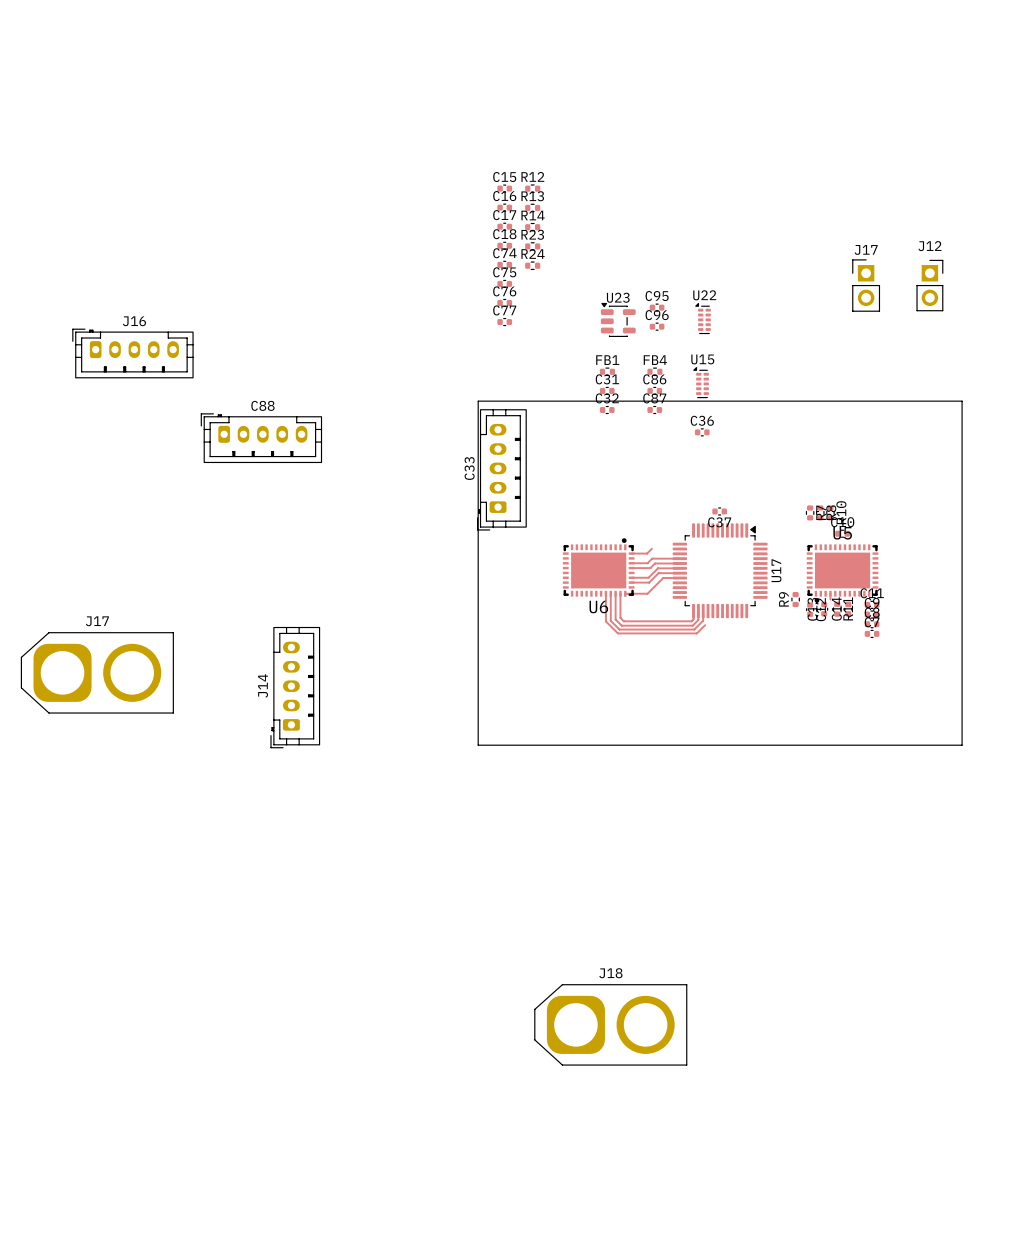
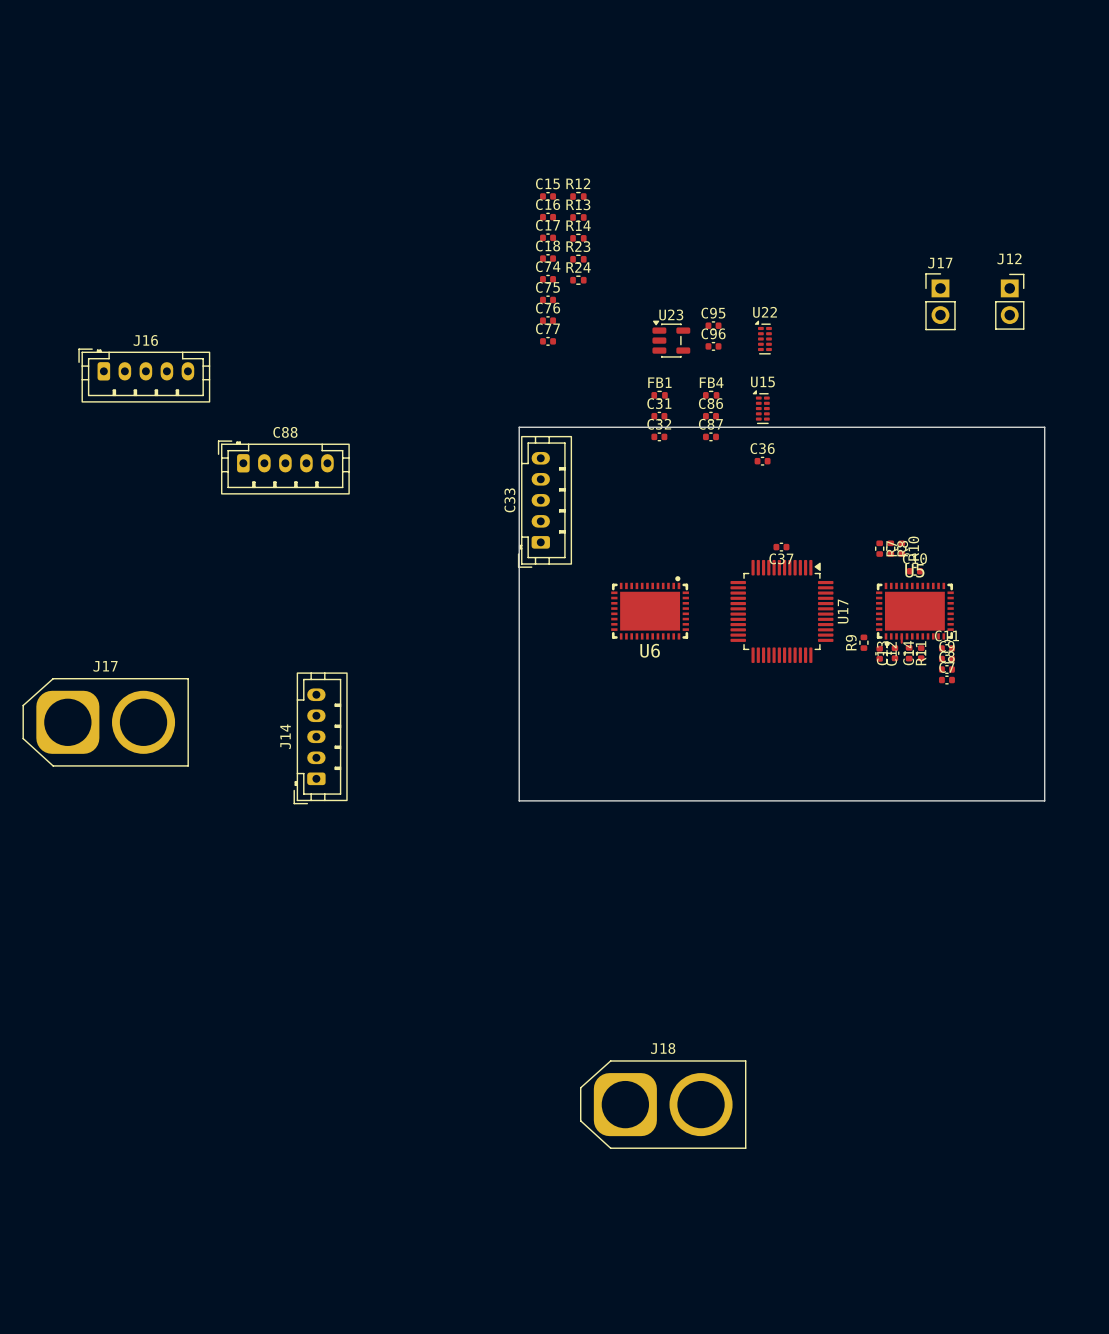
track: (651, 548) (647, 553) (631, 553) -> none
track: (679, 558) (652, 558) (647, 563) (631, 563) -> none
track: (679, 563) (655, 563) (650, 568) (631, 568) -> none
track: (679, 568) (657, 568) (648, 577) (631, 577) -> none
track: (679, 573) (658, 573) (649, 582) (631, 582) -> none
track: (679, 578) (663, 578) (647, 593) (625, 593) (625, 595) -> none
track: (605, 593) (605, 621) (617, 633) (696, 633) (705, 625) -> none
track: (610, 593) (610, 620) (619, 629) (694, 629) (703, 620) (703, 611) -> none
track: (615, 593) (615, 619) (621, 625) (692, 625) (698, 620) (698, 611) -> none
track: (620, 593) (620, 617) (623, 621) (691, 621) (693, 619) (693, 611) -> none

